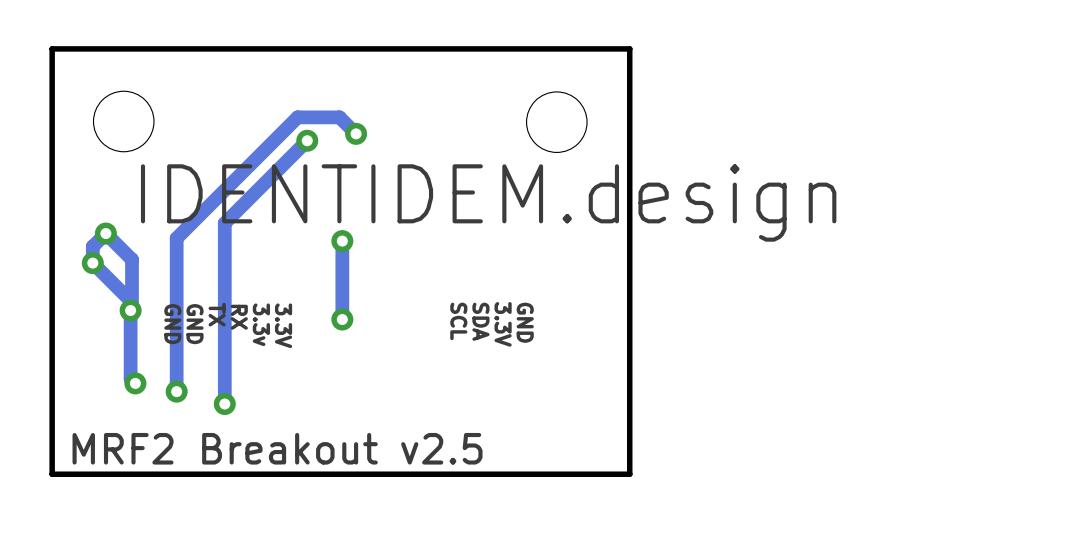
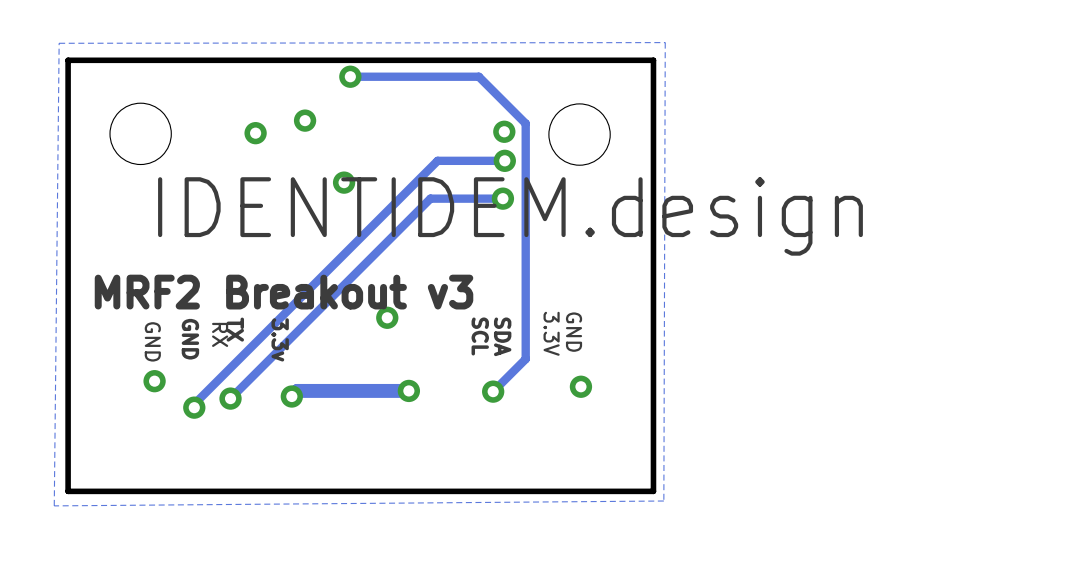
zone outline: none -> (665, 42) (663, 501) (54, 505) (59, 43) (665, 42)
track: none -> (350, 76) (478, 76) (525, 123) (525, 359) (493, 391)
via: none -> (350, 76)
via: none -> (305, 120)
via: none -> (504, 131)
via: none -> (255, 133)
track: (356, 133) (339, 117) (297, 117) (176, 238) (176, 391) -> none
via: (356, 133) -> none
track: (307, 140) (224, 223) (224, 404) -> none
via: (307, 140) -> none
track: none -> (504, 160) (437, 160) (196, 402)
via: none -> (504, 160)
via: none -> (344, 182)
track: none -> (502, 198) (430, 198) (230, 398)
via: none -> (502, 198)
via: (105, 233) -> none
track: (342, 241) (342, 319) -> none
via: (342, 241) -> none
via: (92, 263) -> none
text: none -> MRF2 Breakout v3 (284, 292)
track: (130, 310) (131, 309) (131, 259) (105, 233) (92, 246) (92, 263) (130, 300) (130, 378) (135, 383) -> none
via: (130, 310) -> none
text position: RX (239, 317) -> RX (220, 334)
via position: (342, 319) -> (387, 317)
text position: GND (525, 322) -> GND (574, 332)
text position: GND (194, 324) -> GND (152, 341)
text position: 3.3V (503, 324) -> 3.3V (551, 333)
text: 3.3V (283, 325) -> none
via: none -> (580, 386)
track: none -> (408, 390) (297, 390) (291, 396)
via: none -> (408, 390)
via: none -> (493, 391)
via: none -> (291, 396)
via position: (135, 383) -> (154, 381)
via position: (224, 404) -> (230, 398)
text: MRF2 Breakout v2.5 (277, 448) -> none

